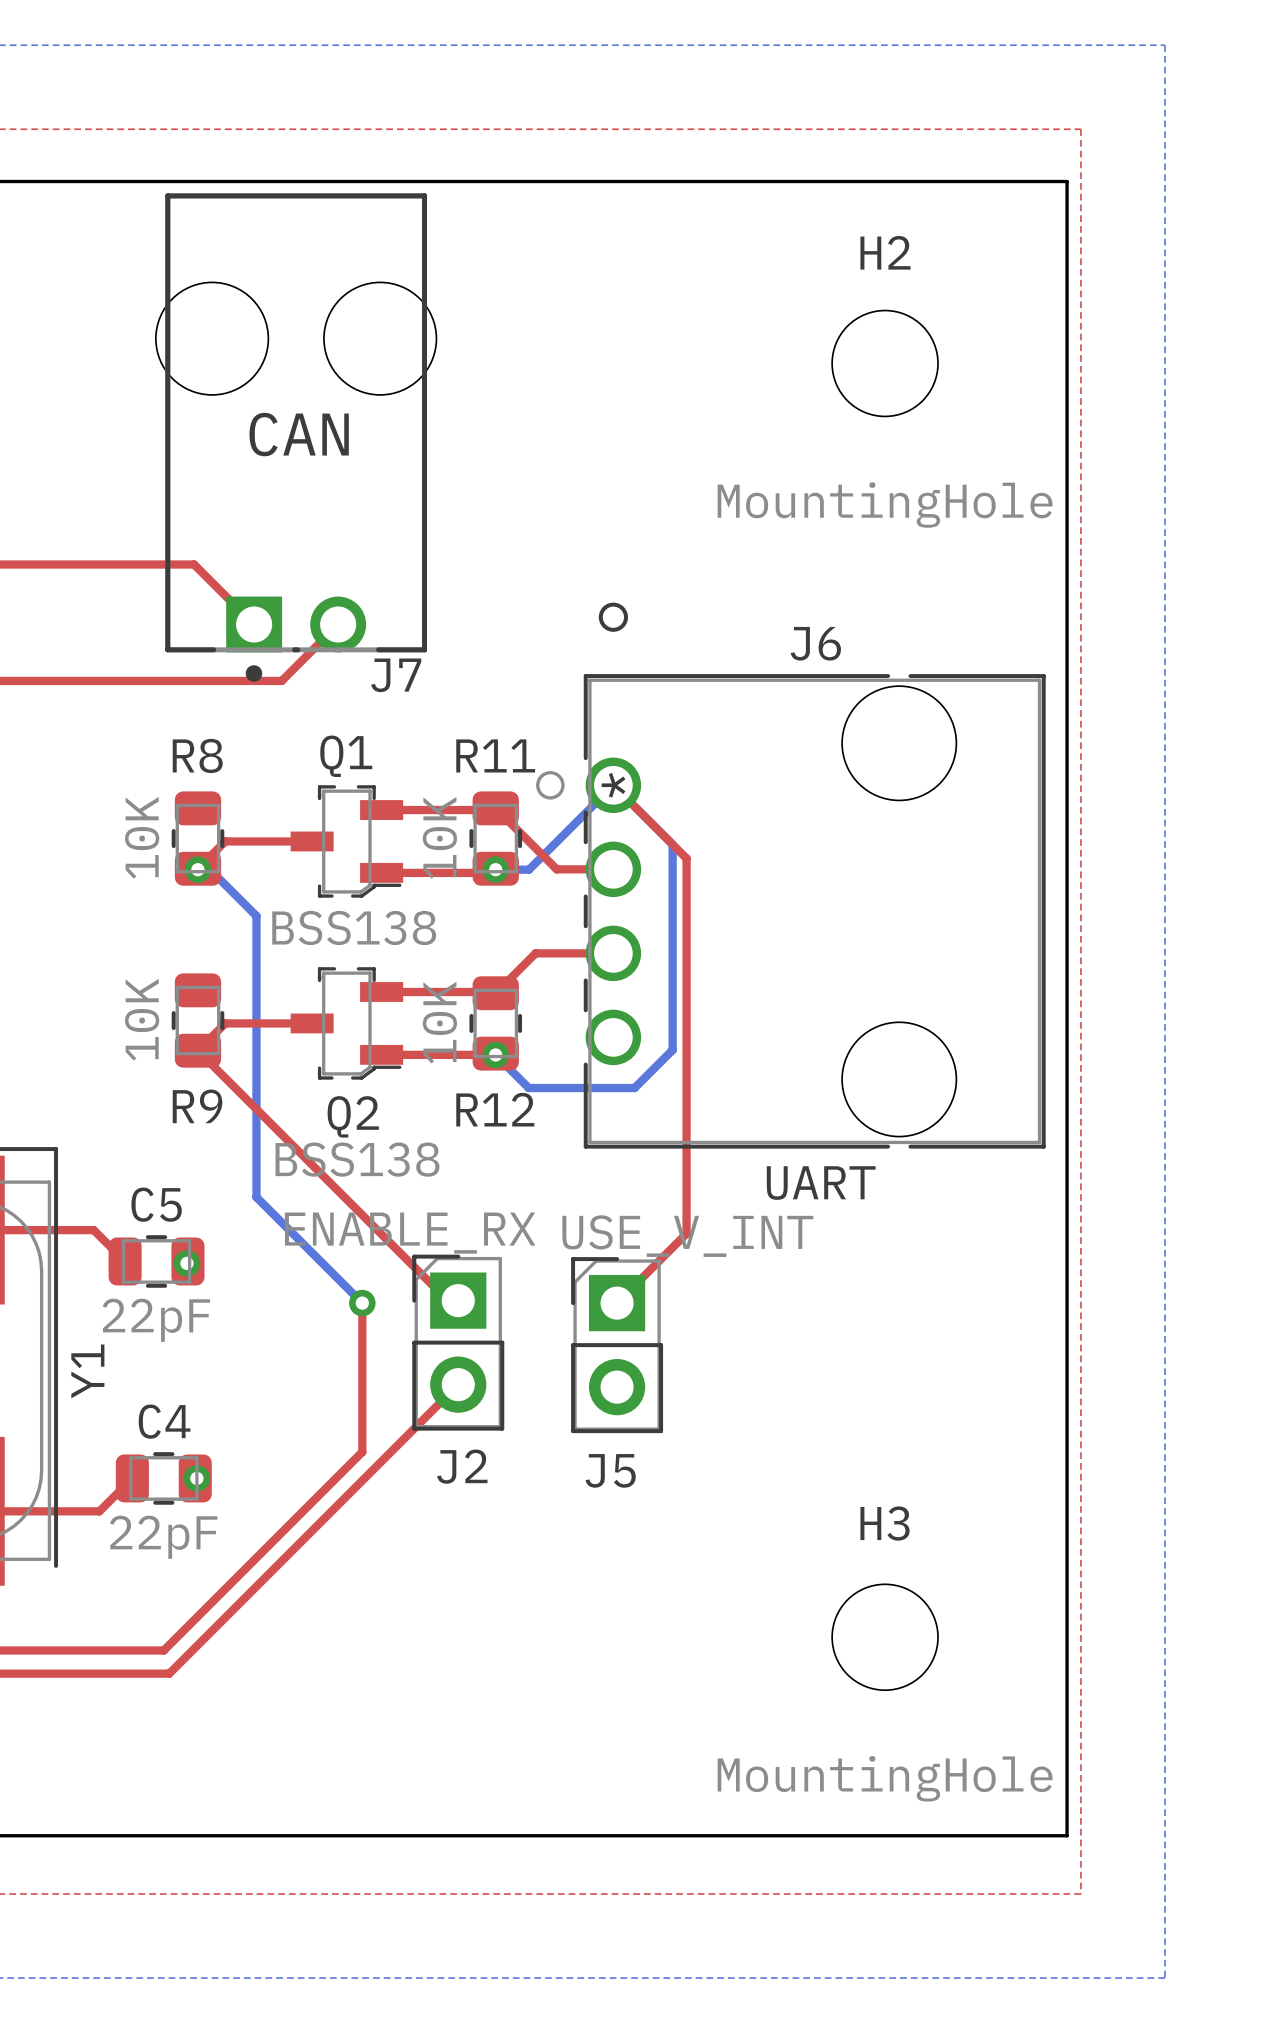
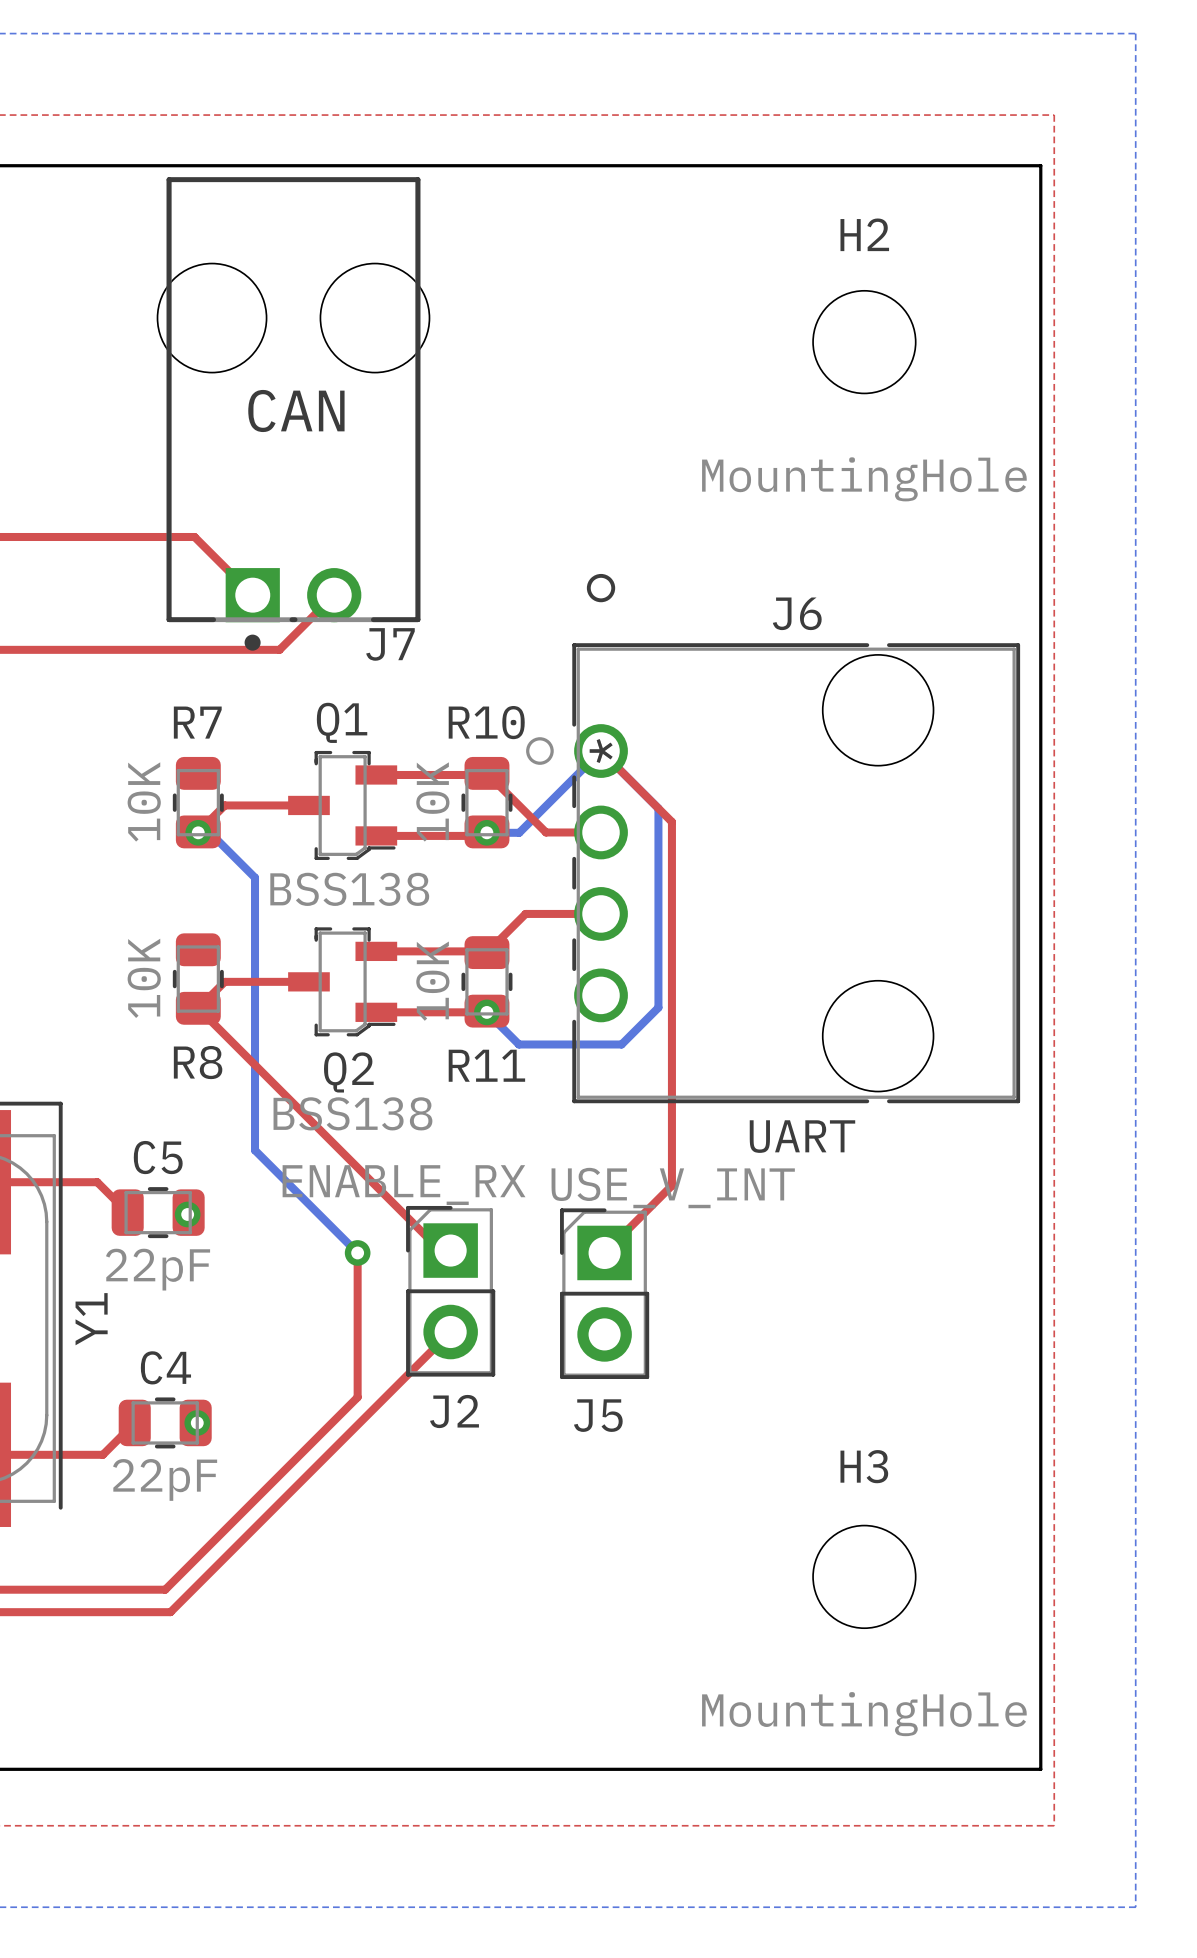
R8 name: R8 (197, 755) -> R7 (197, 722)
R11 name: R11 (495, 755) -> R10 (486, 722)
R9 name: R9 (197, 1106) -> R8 (198, 1062)
R12 name: R12 (495, 1109) -> R11 (486, 1065)

